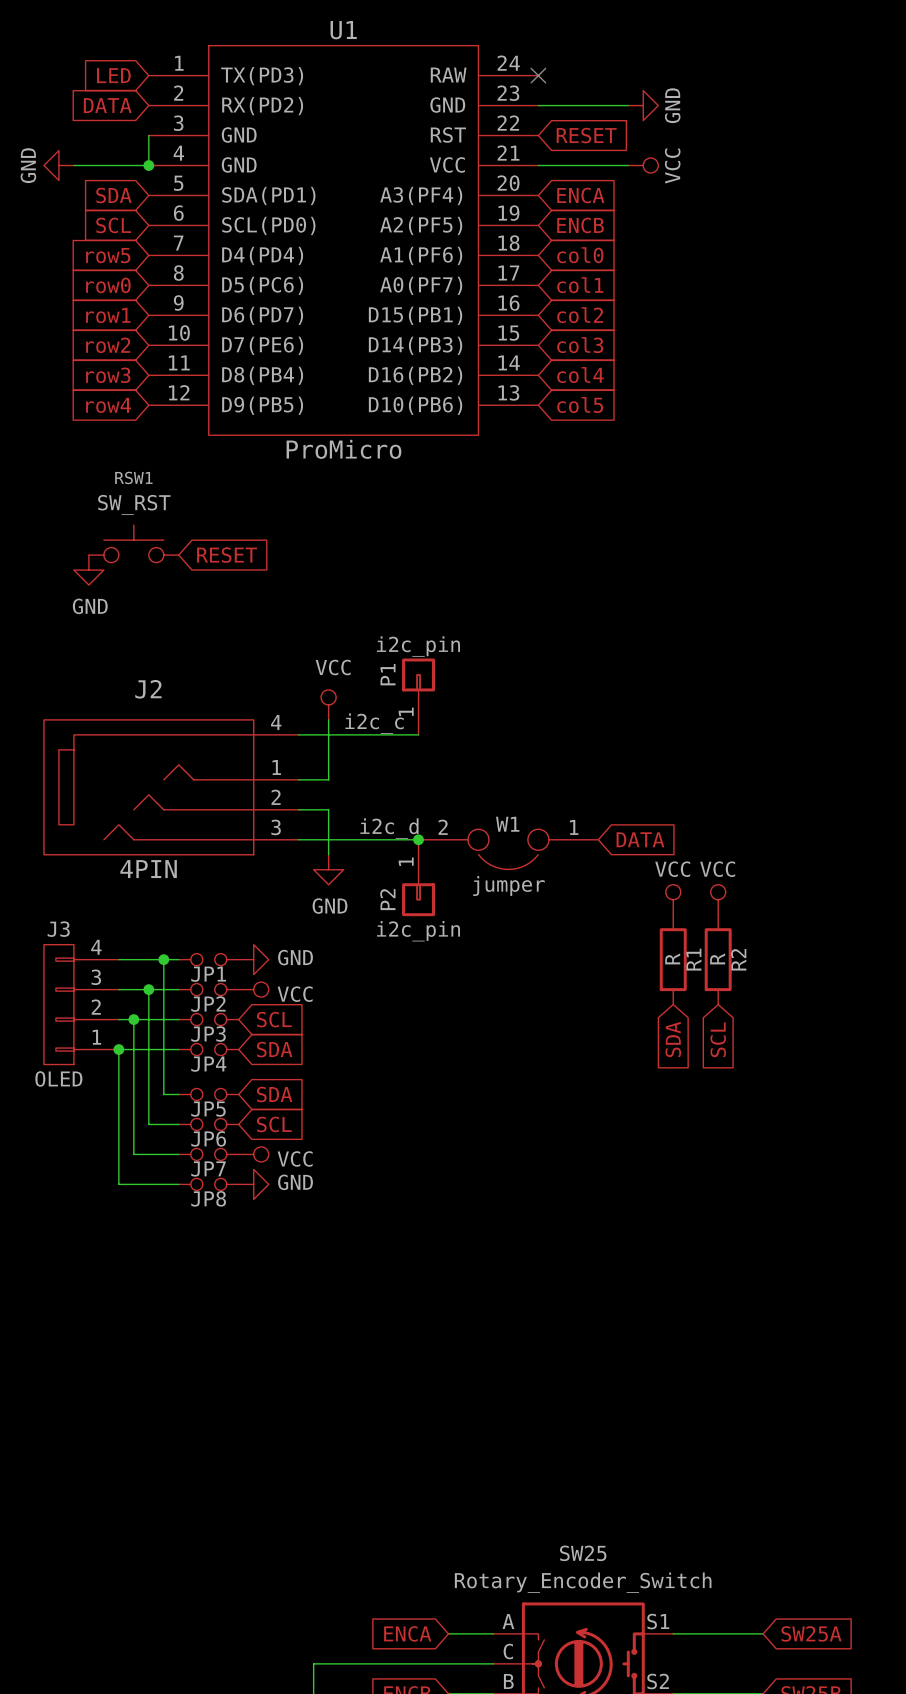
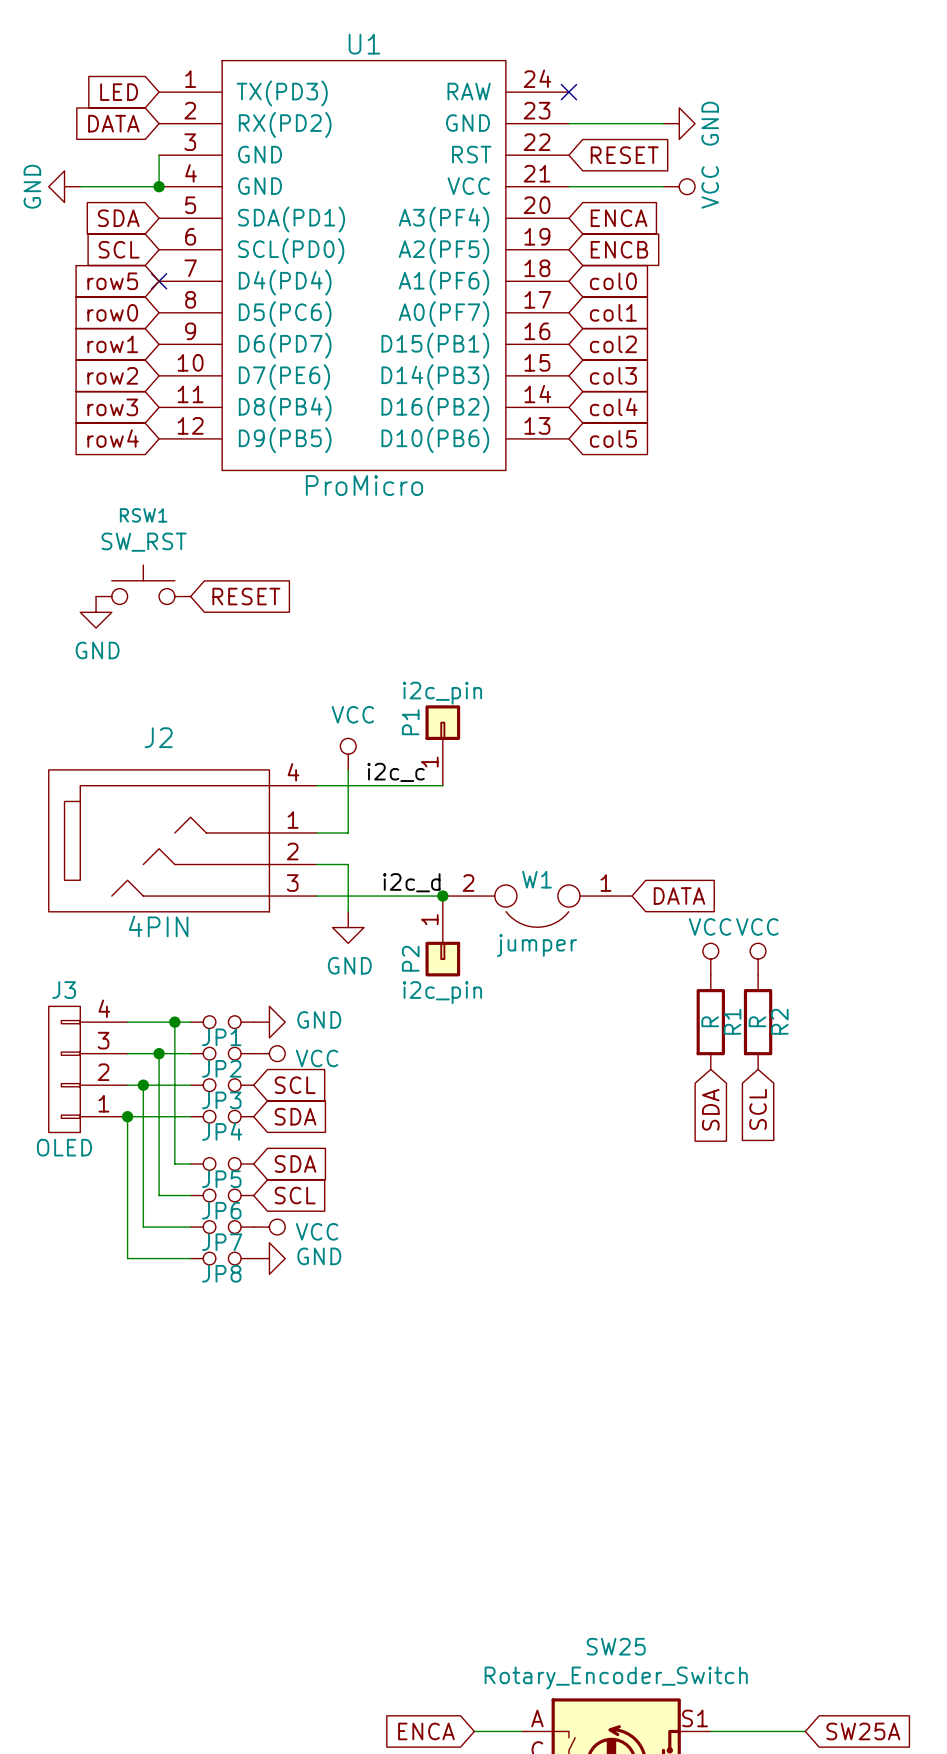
no-connect mark: none -> (159, 281)

